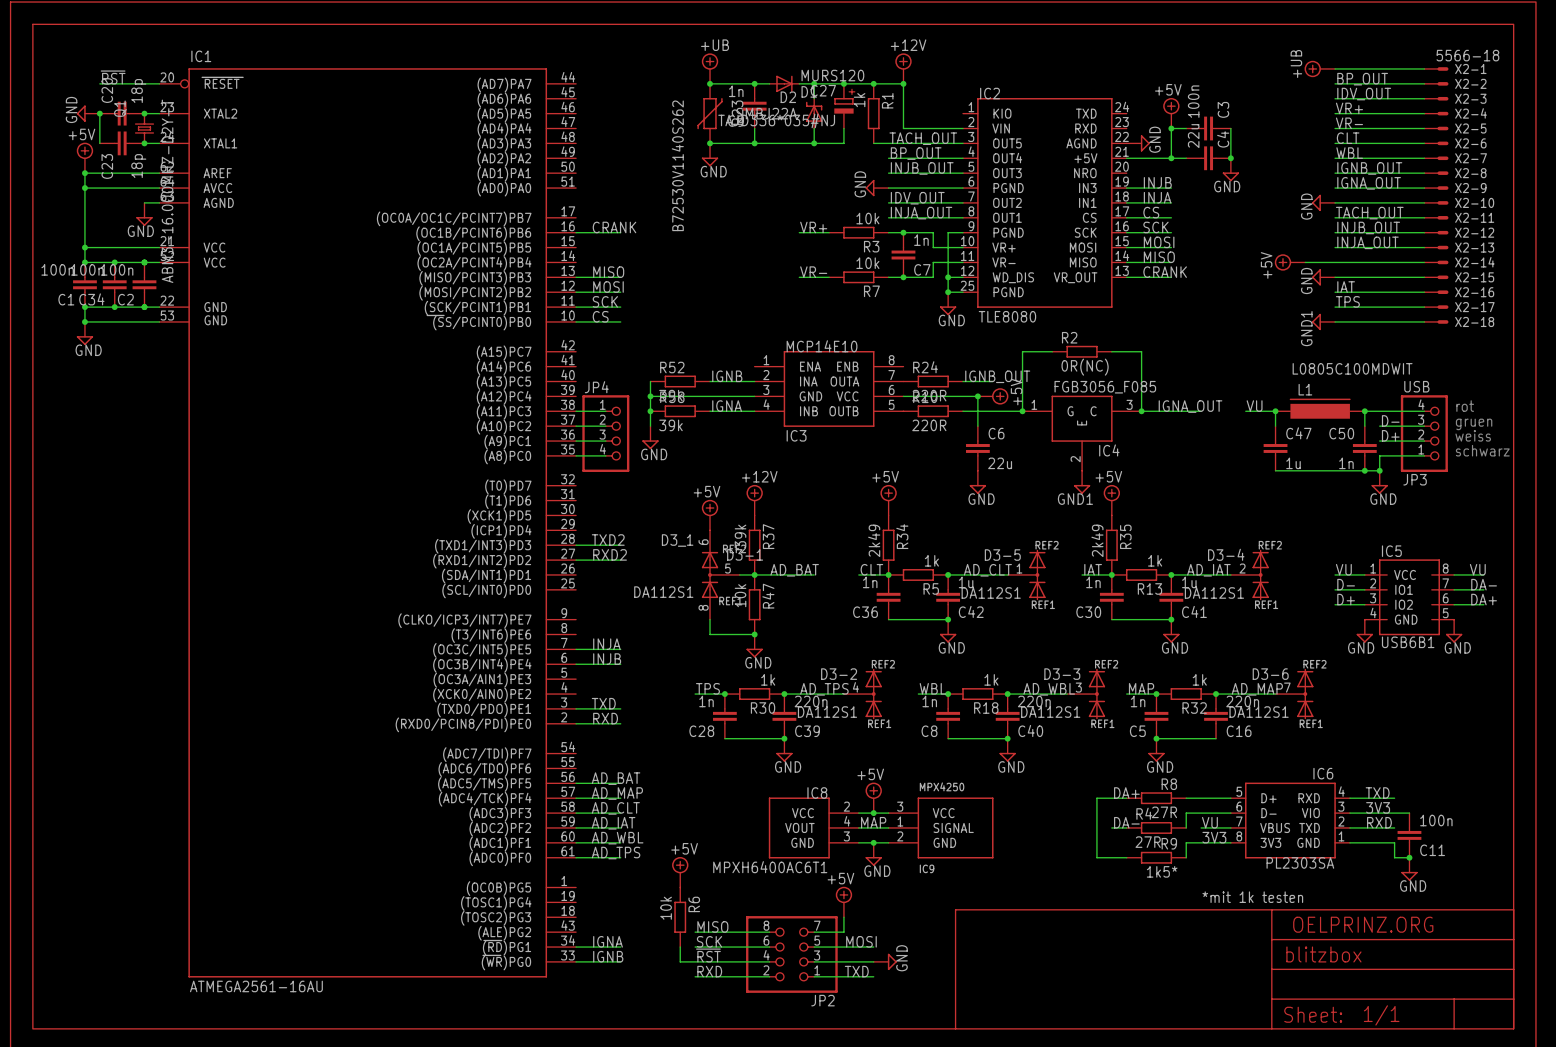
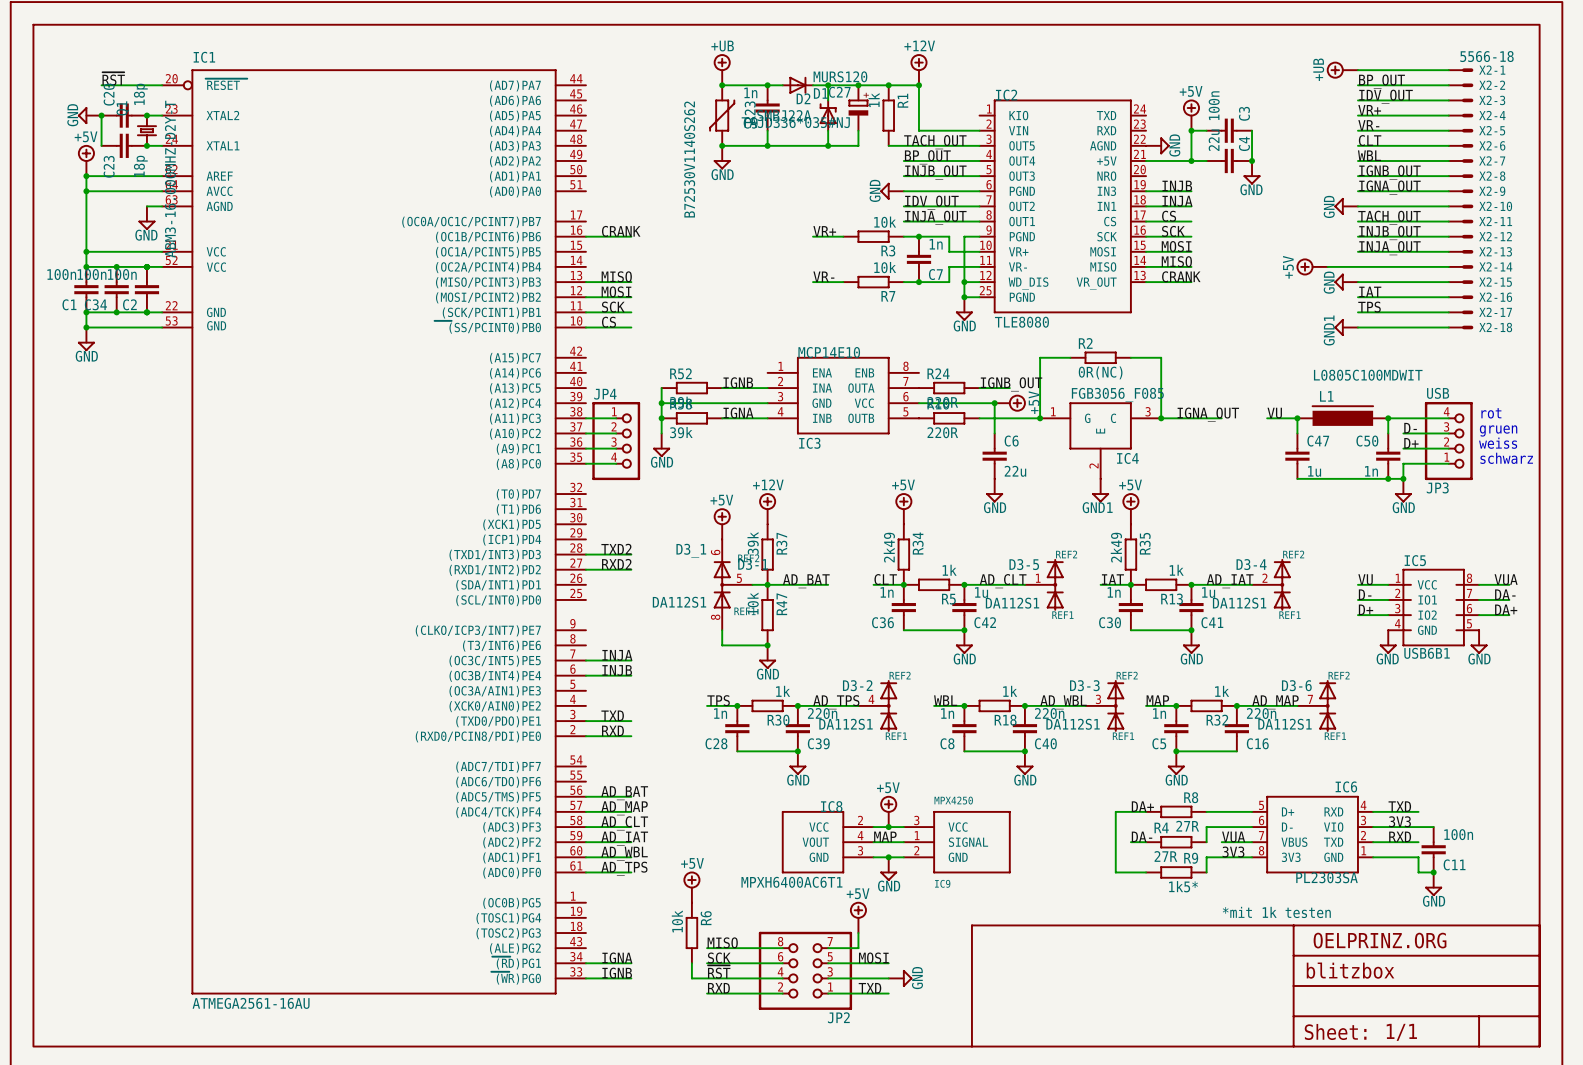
label: VU (1477, 569) -> VUA (1506, 579)
label: VU (1209, 822) -> VUA (1233, 836)

